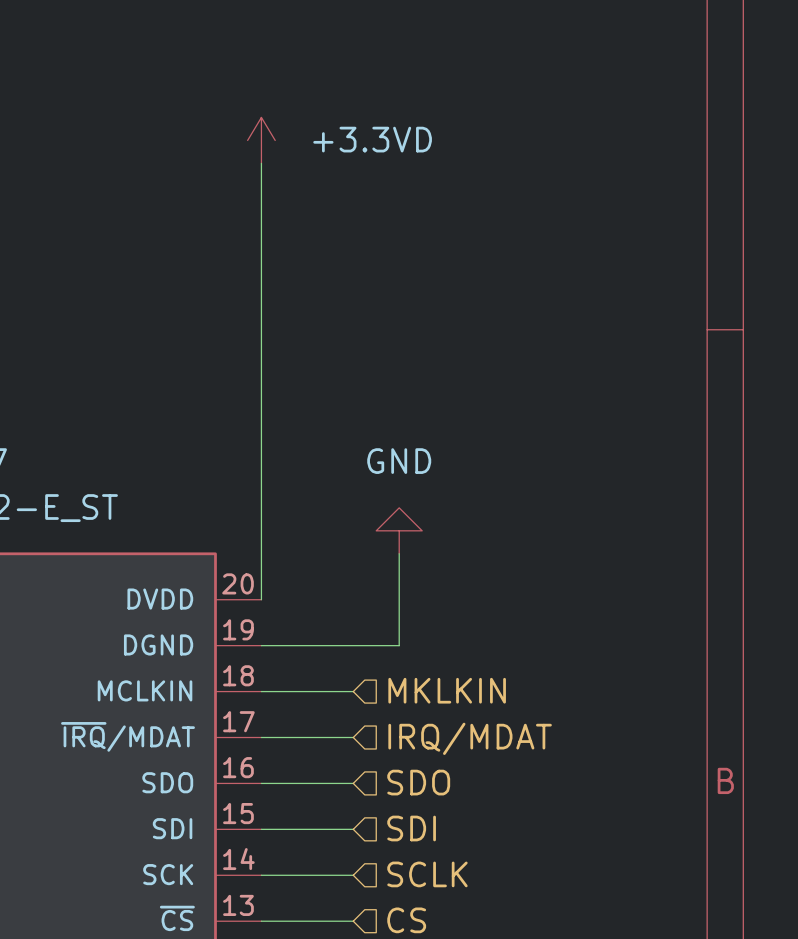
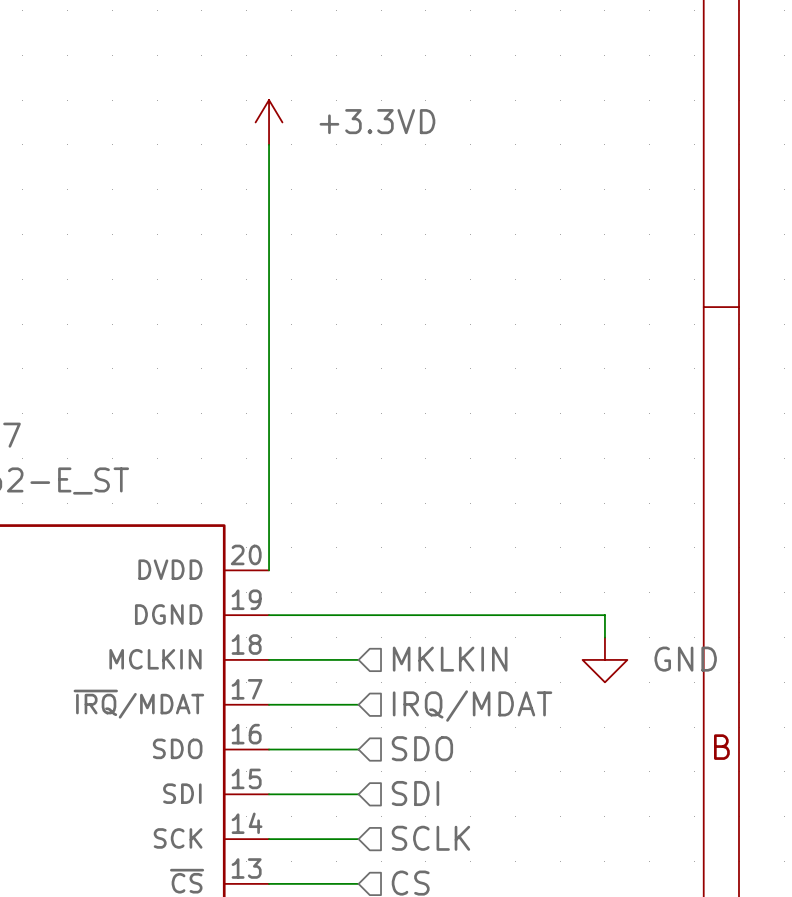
power symbol text position: GND (399, 461) -> GND (685, 659)
power symbol rotation: 0° (399, 530) -> 180° (604, 659)
power symbol position: GND (399, 530) -> GND (604, 659)
wire: (399, 553) (399, 645) -> (604, 637) (604, 615) (403, 615)

